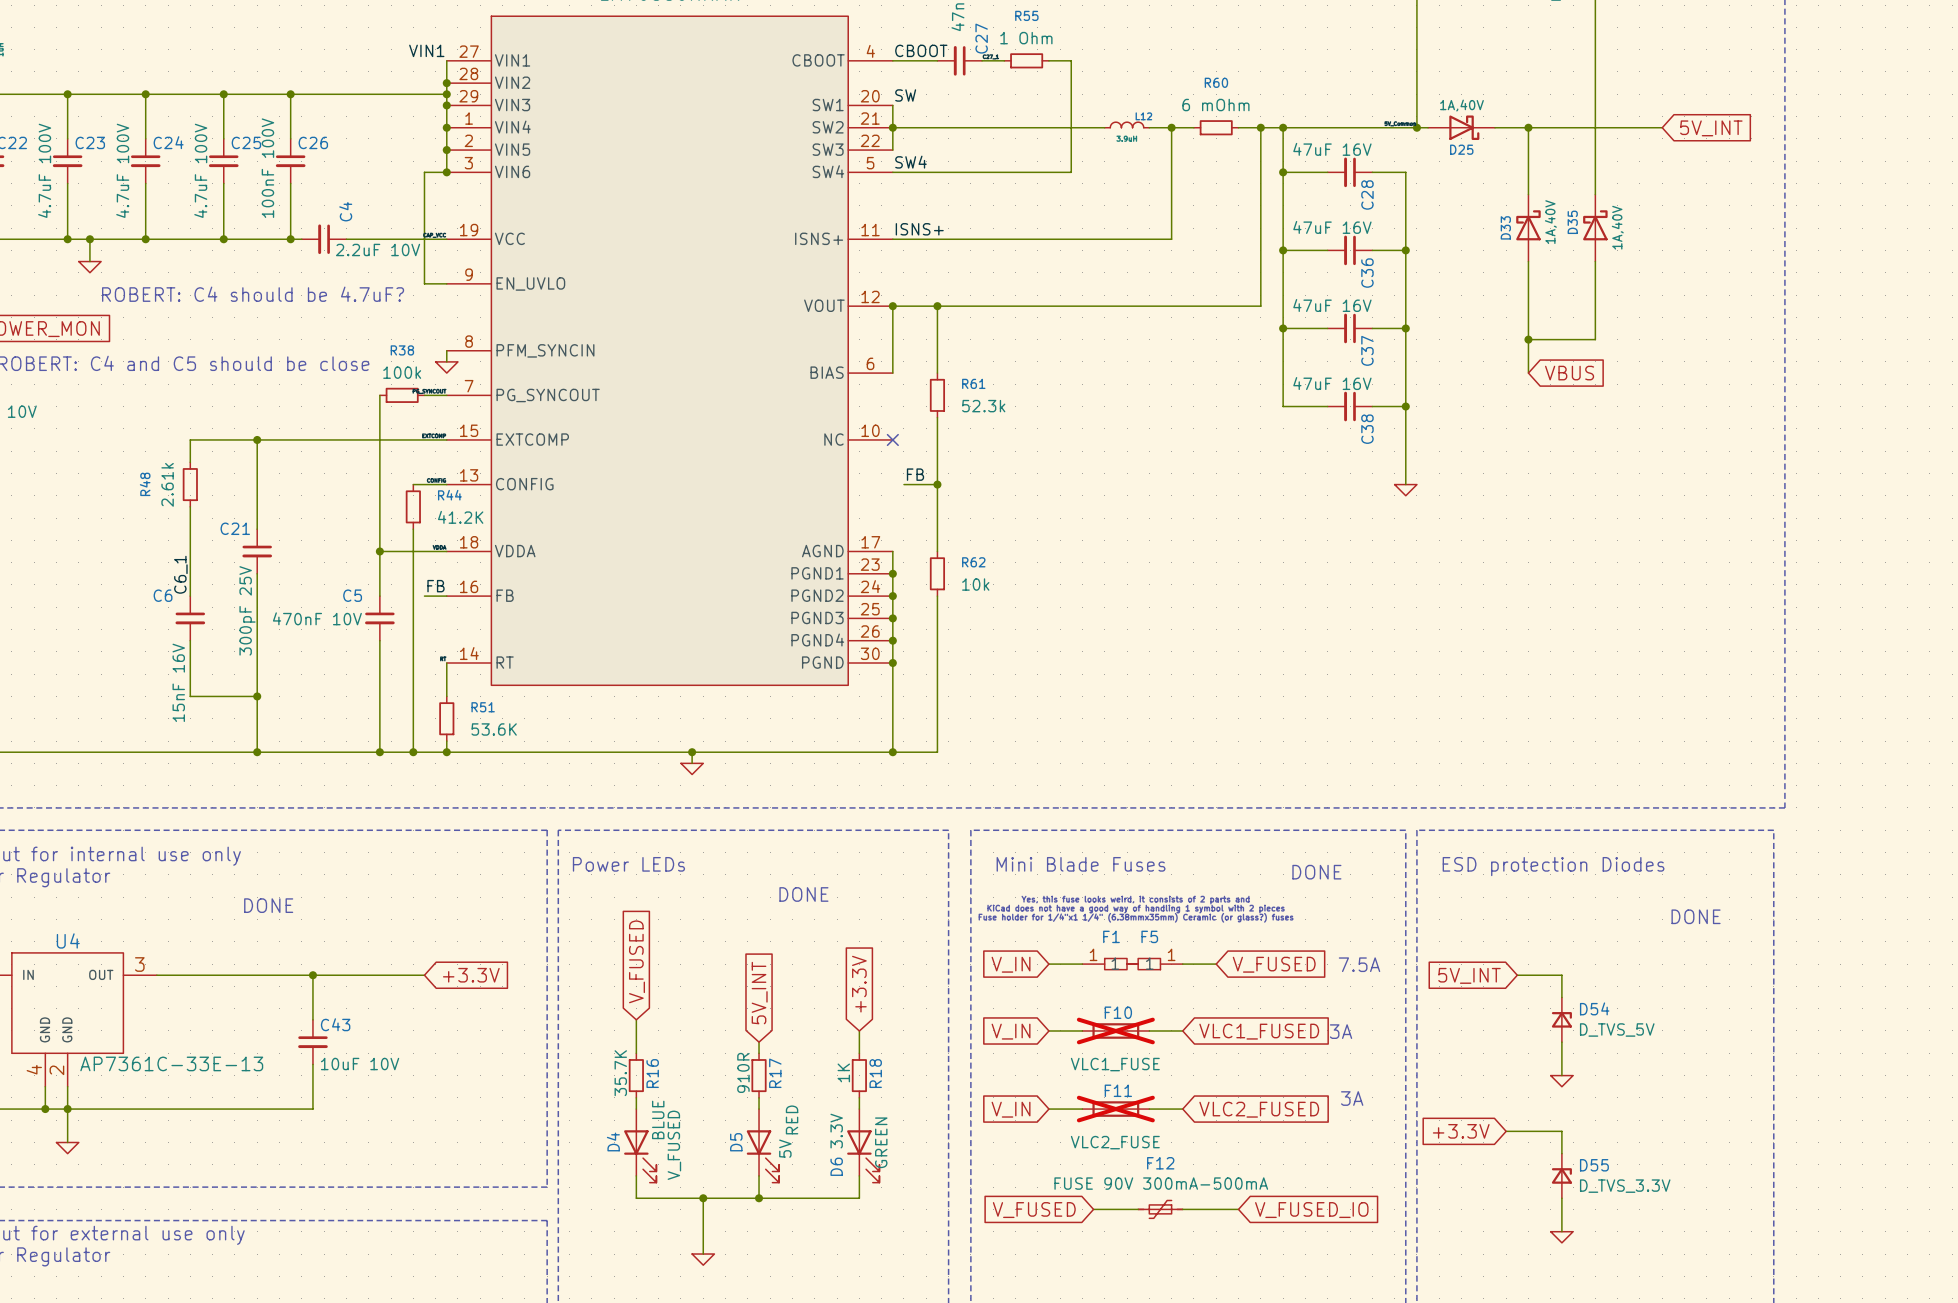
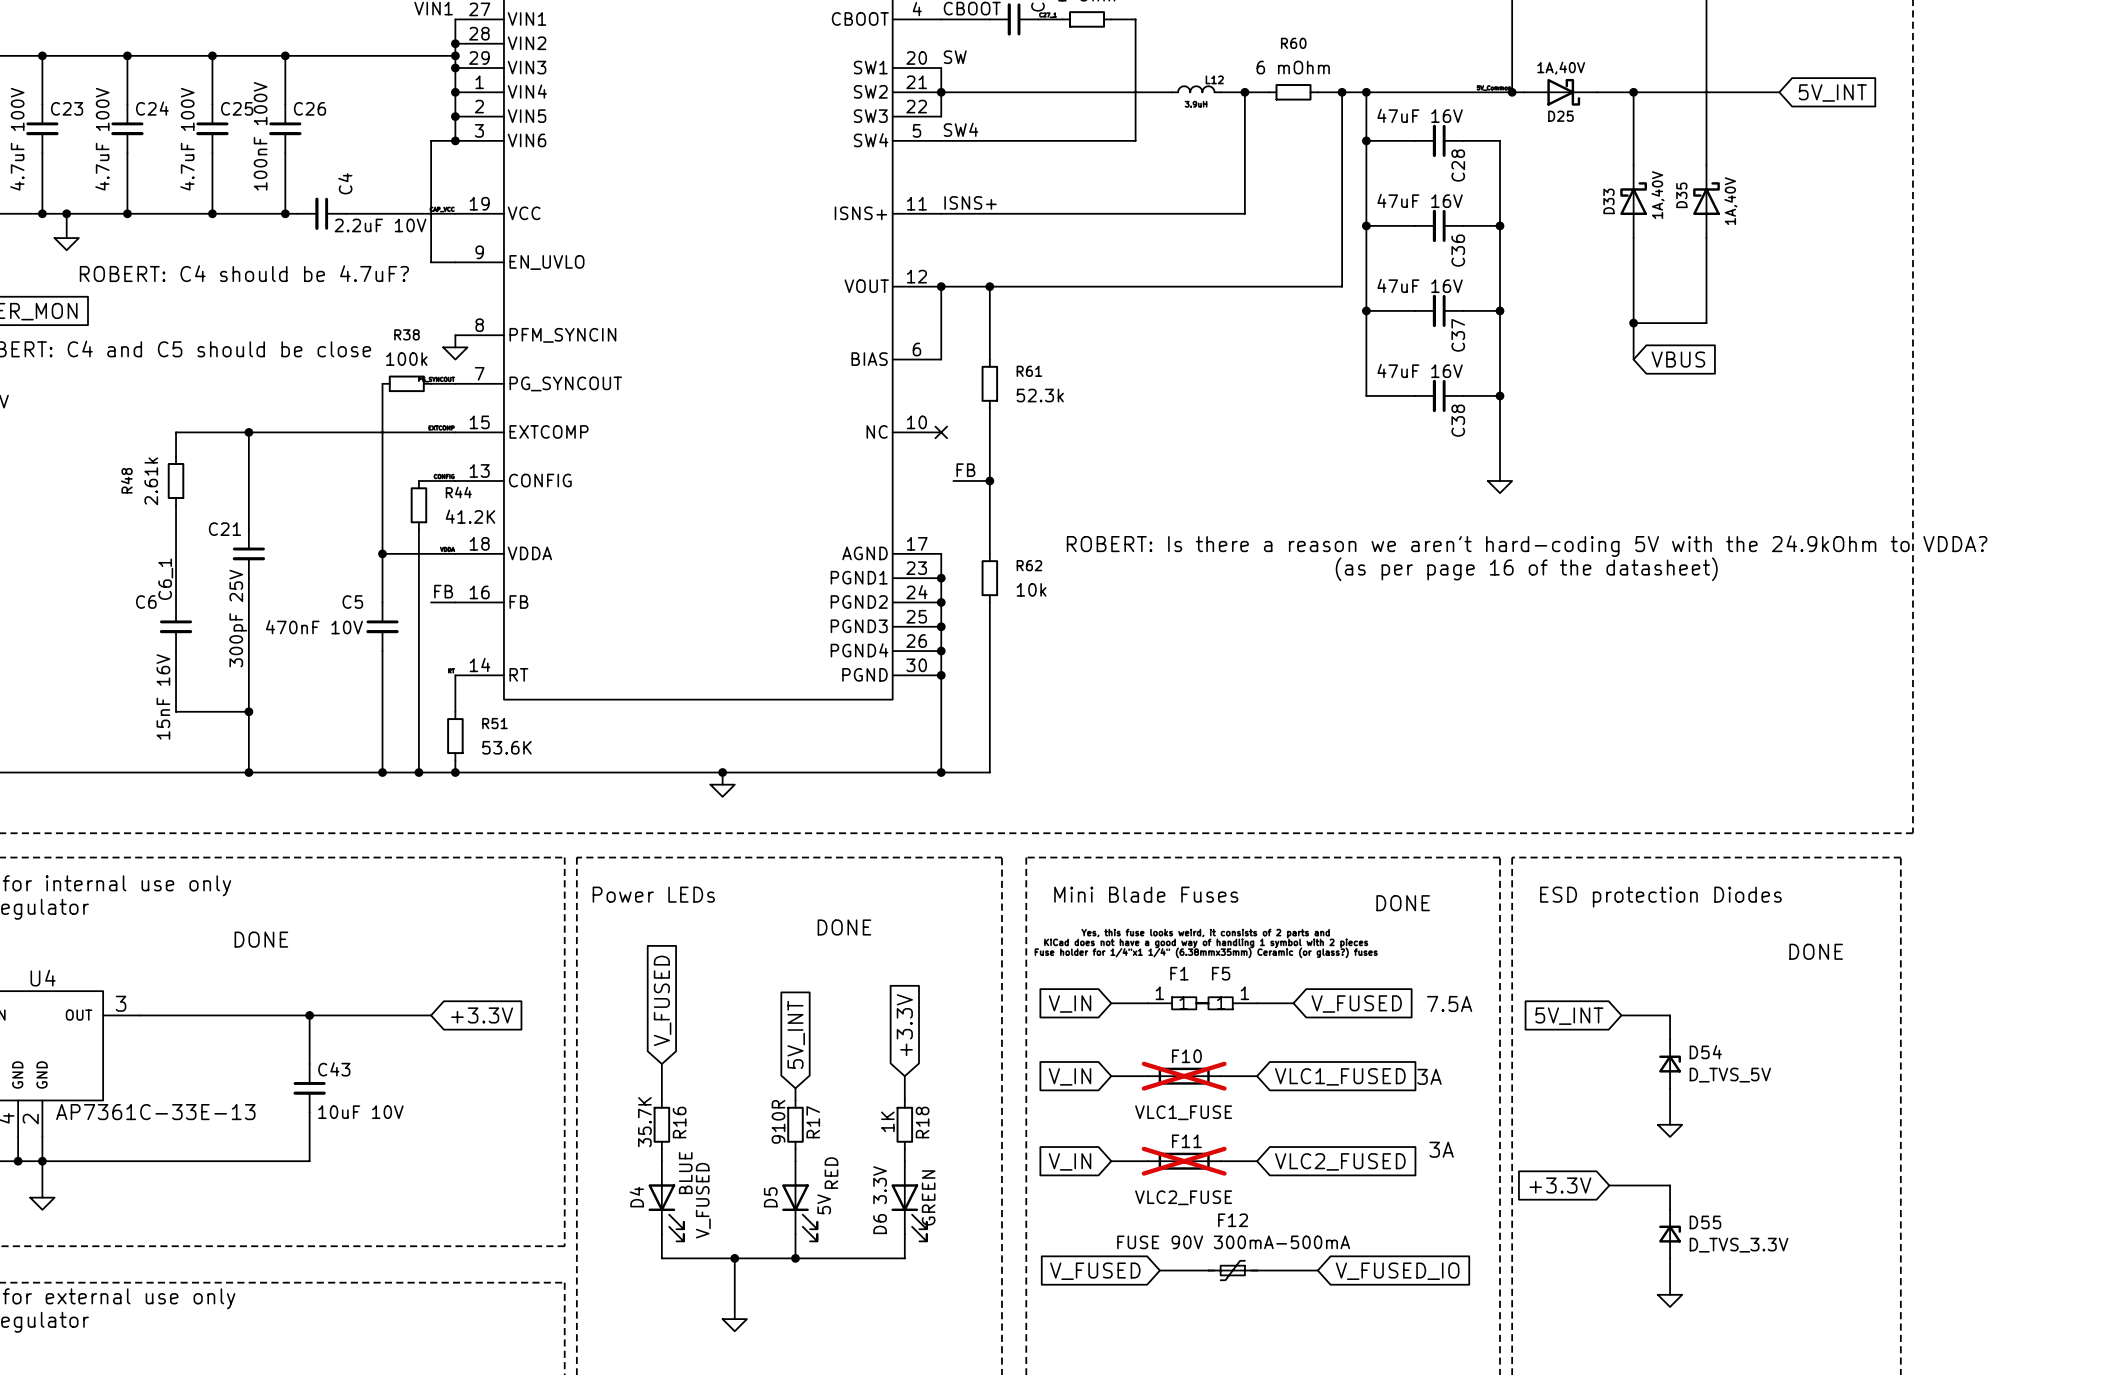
text: none -> ROBERT: Is there a reason we aren't hard-coding 5V with the 24.9kOhm to VDDA? (1527, 546)
text: none -> (as per page 16 of the datasheet) (1526, 569)

